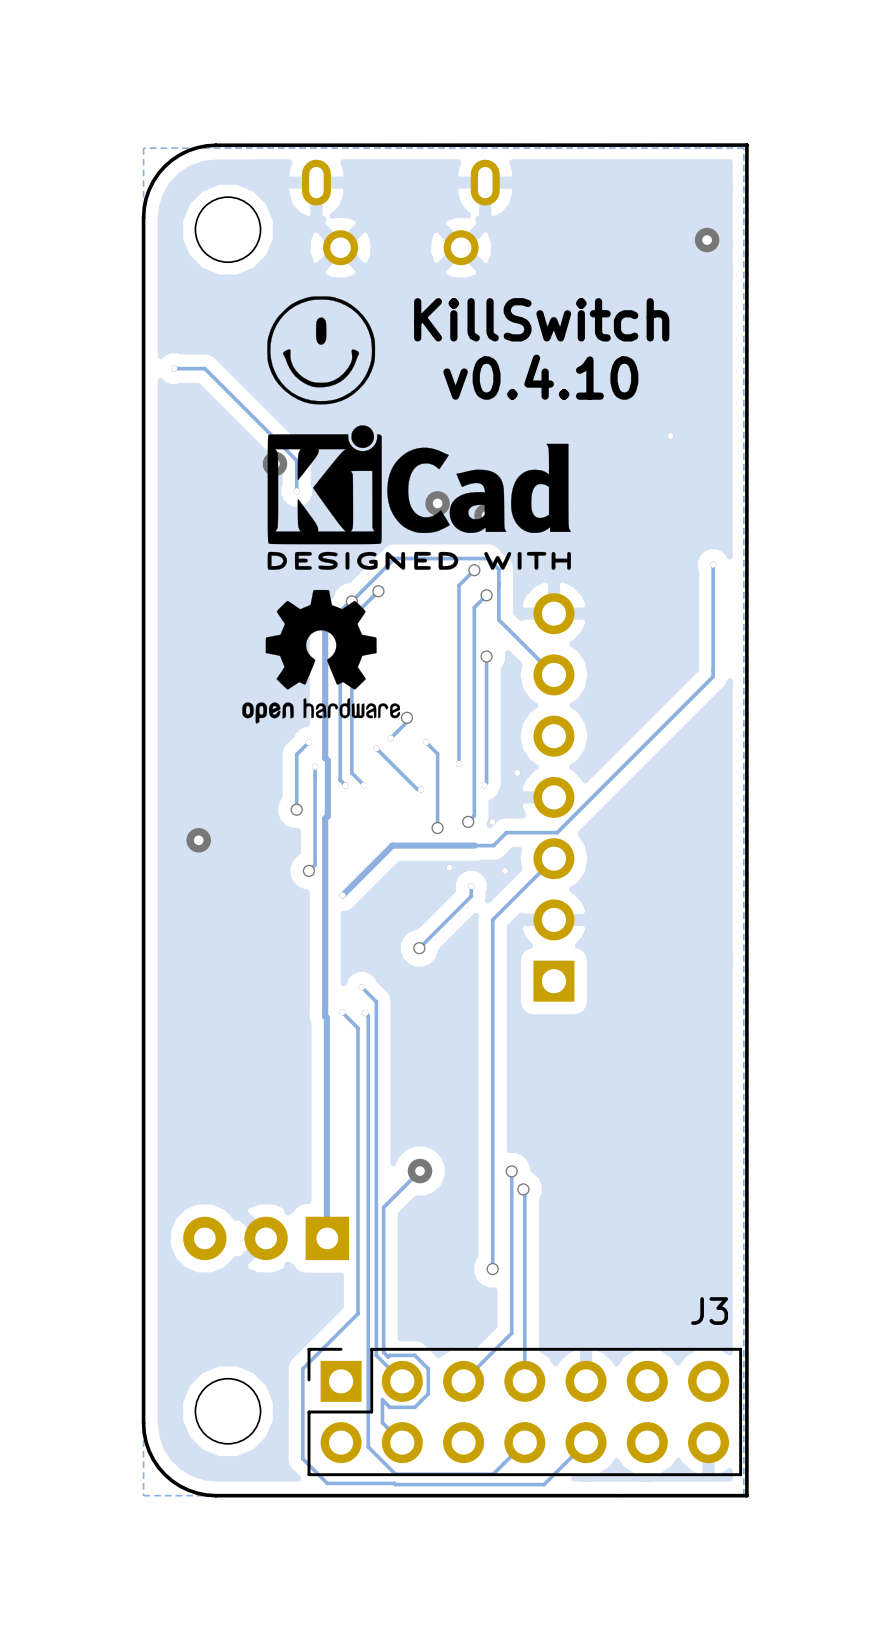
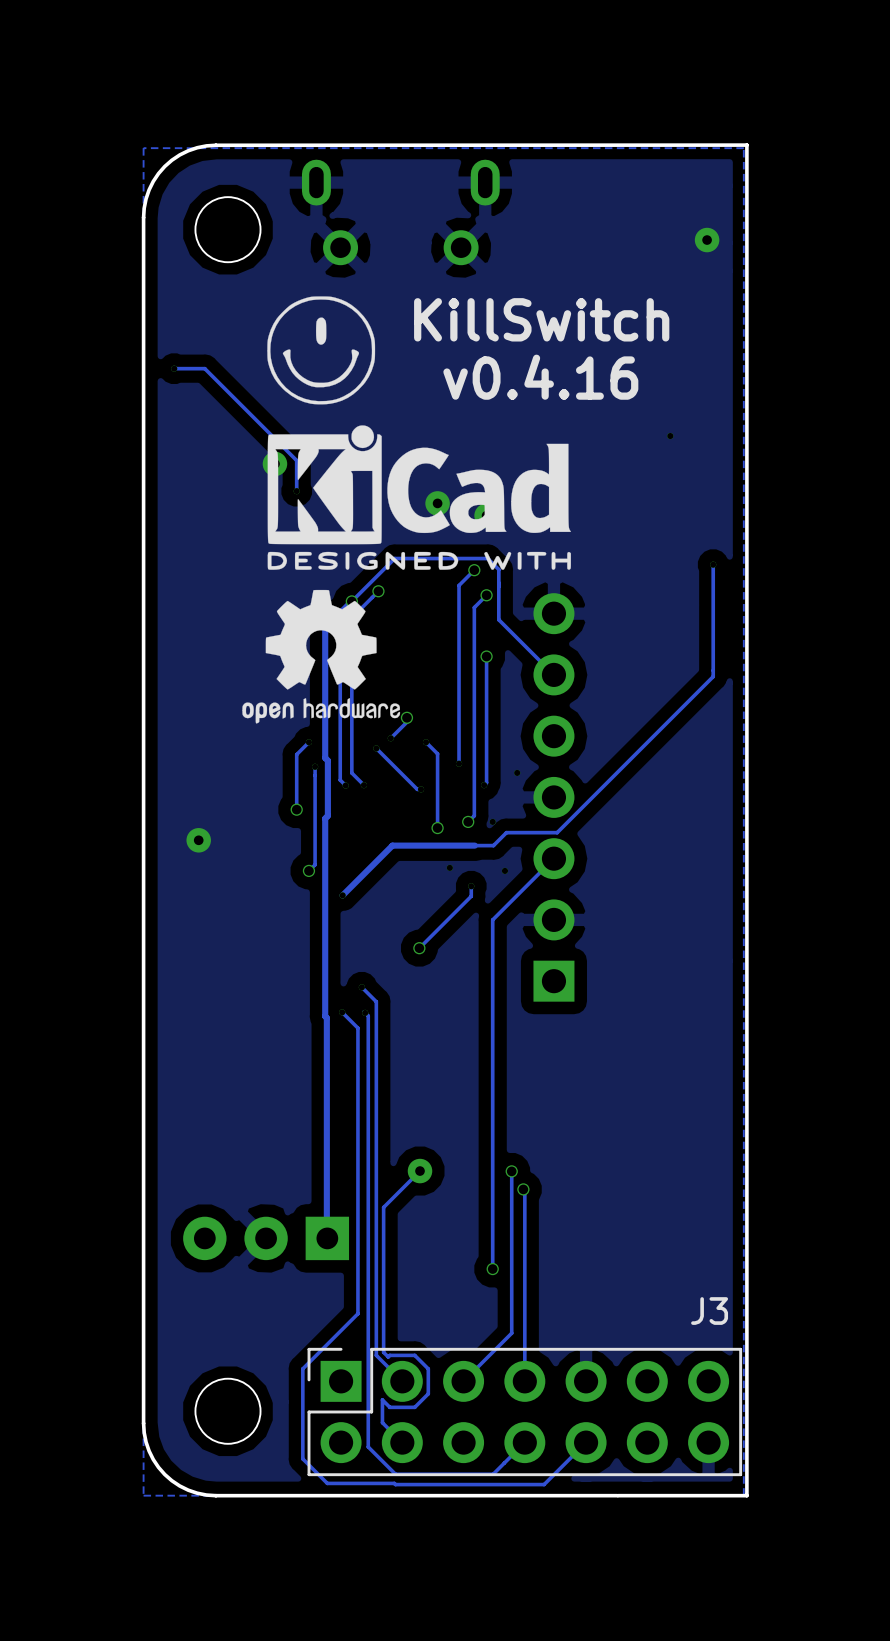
text: v0.4.10 (540, 377) -> v0.4.16 (540, 377)

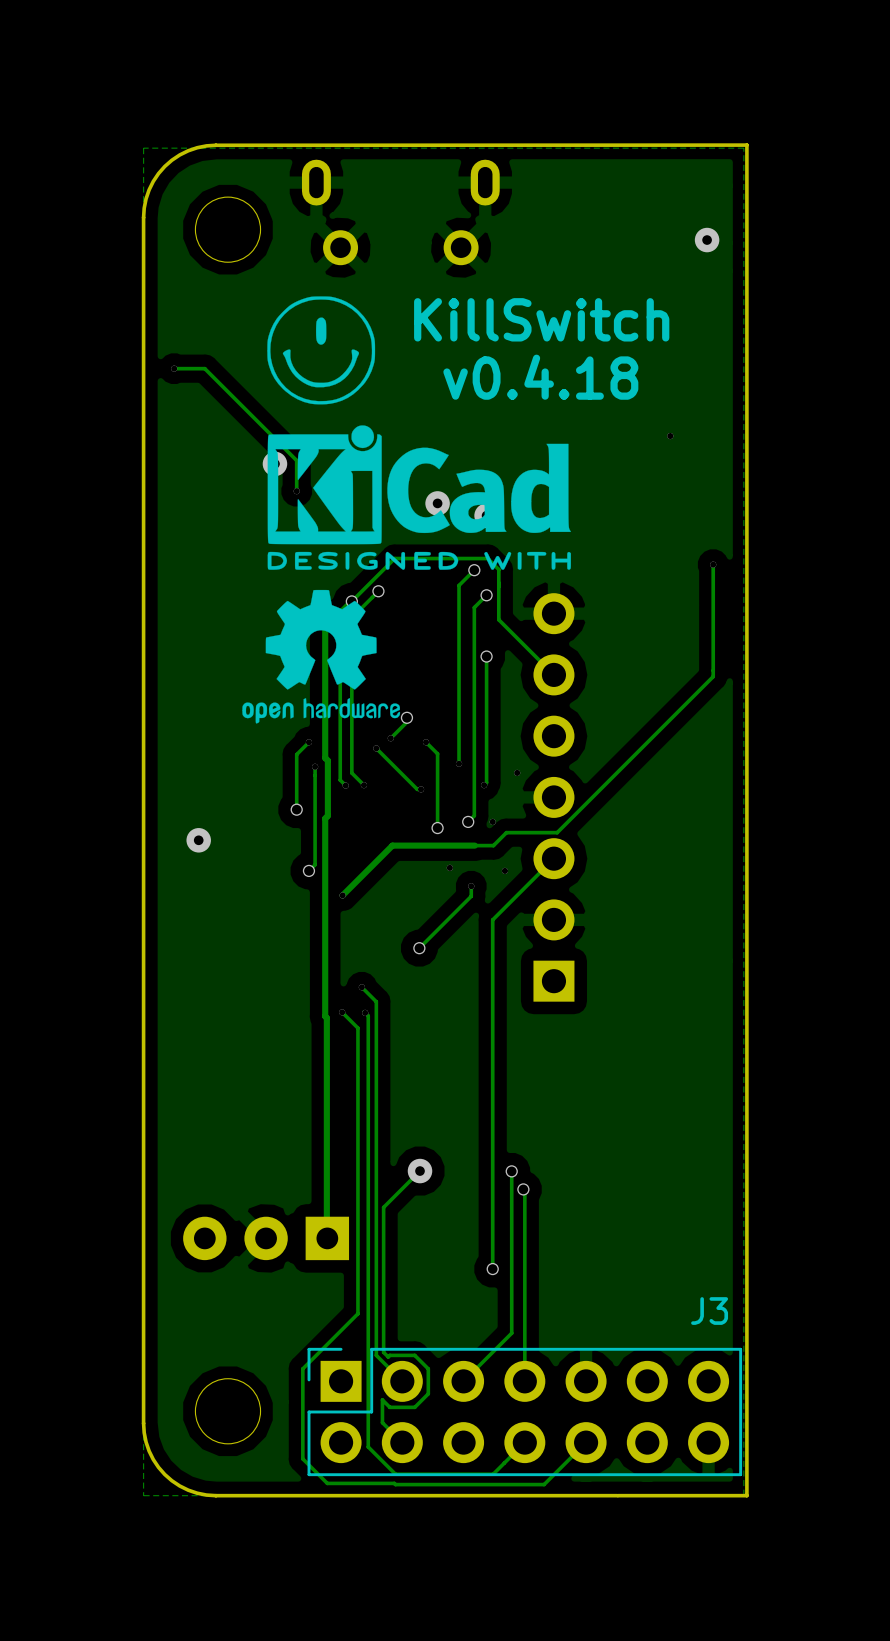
text: v0.4.16 (540, 377) -> v0.4.18 (540, 377)

